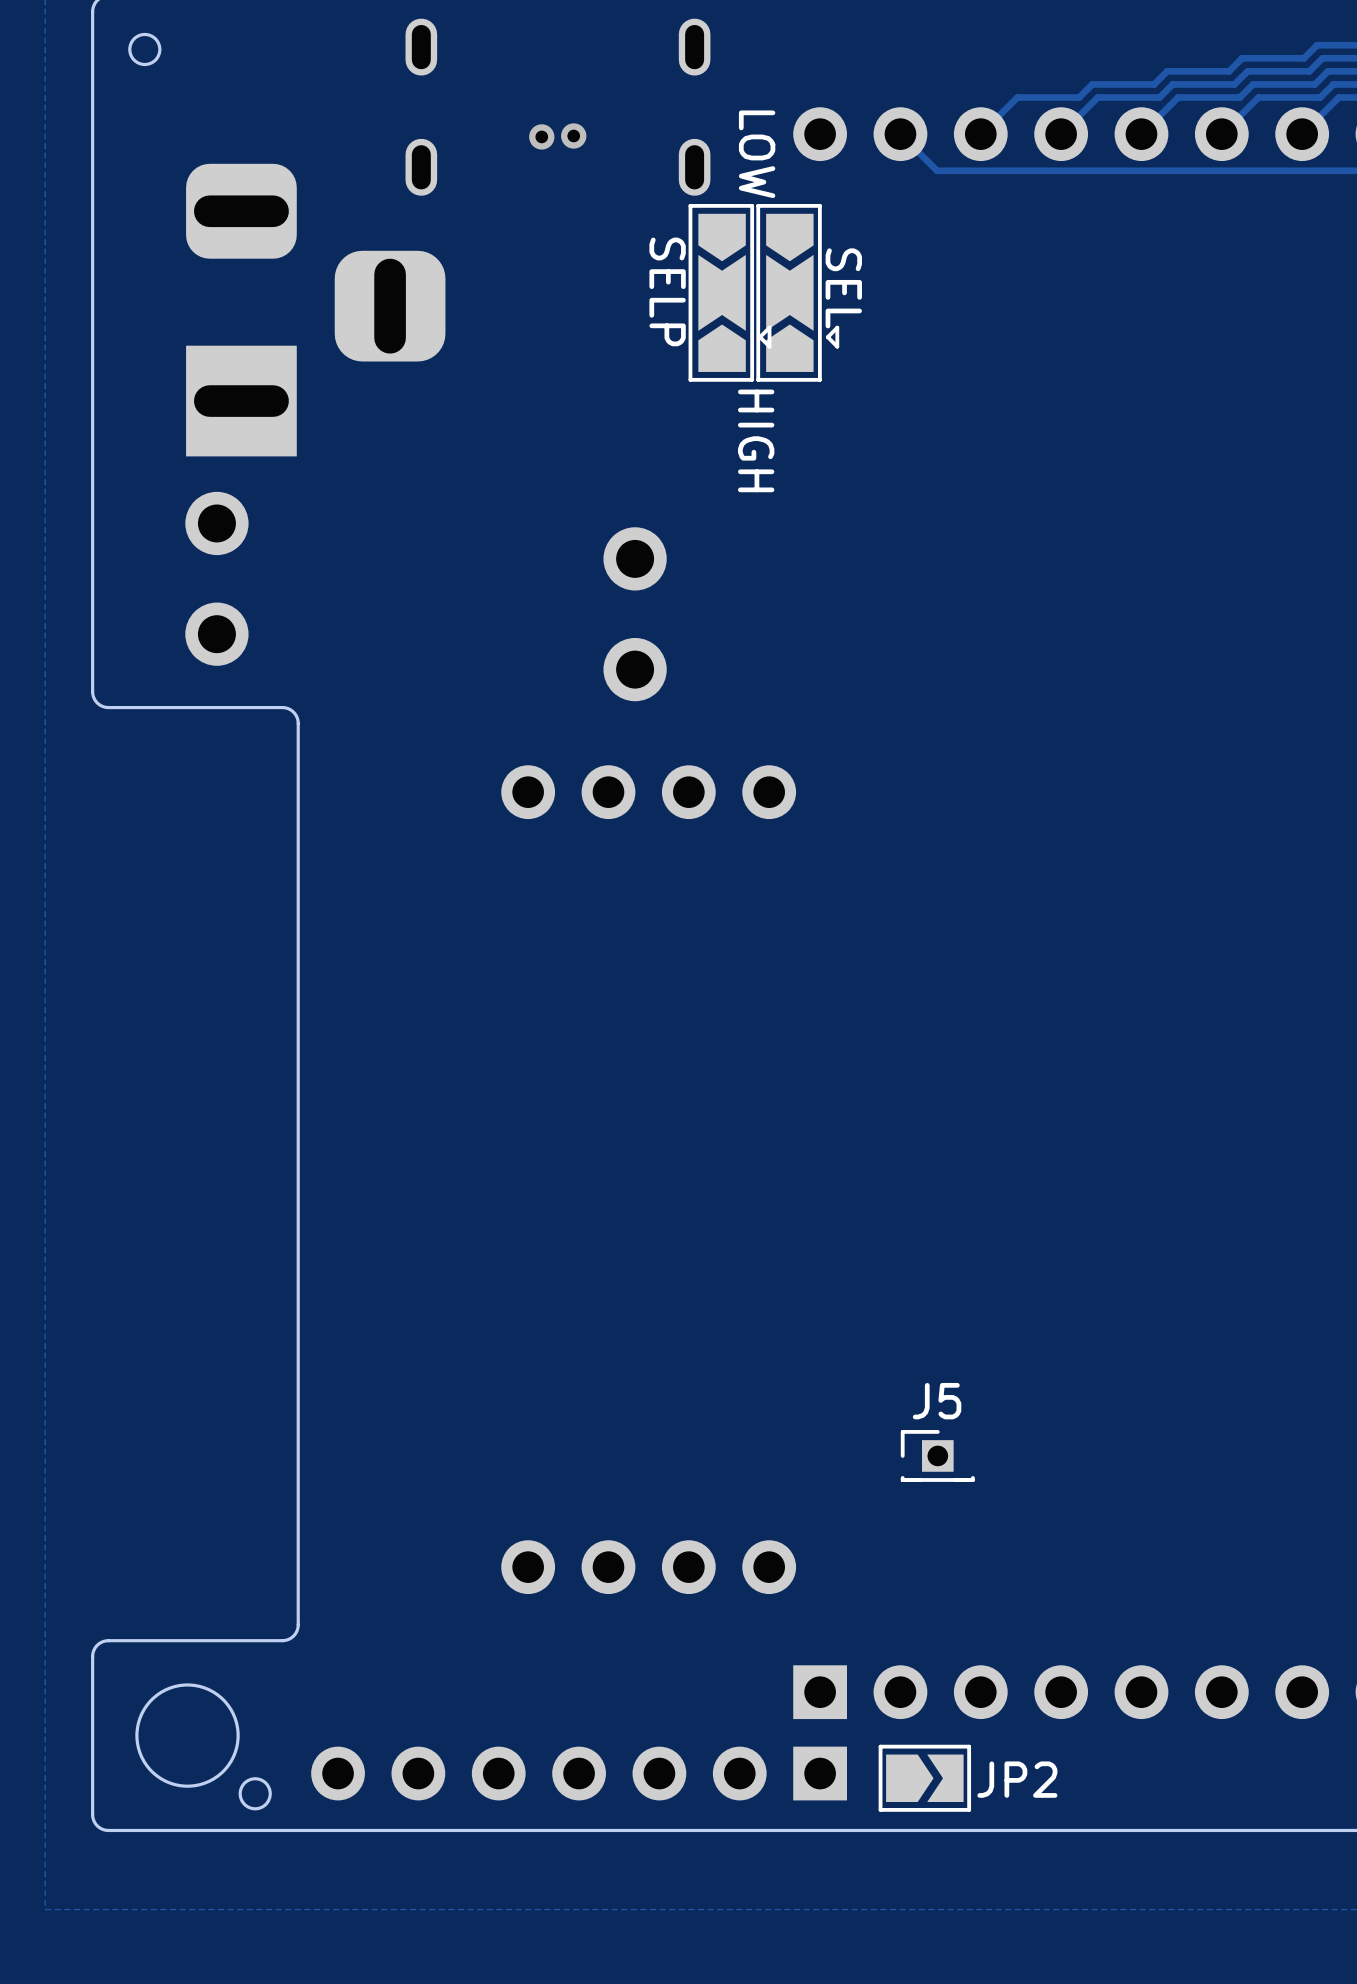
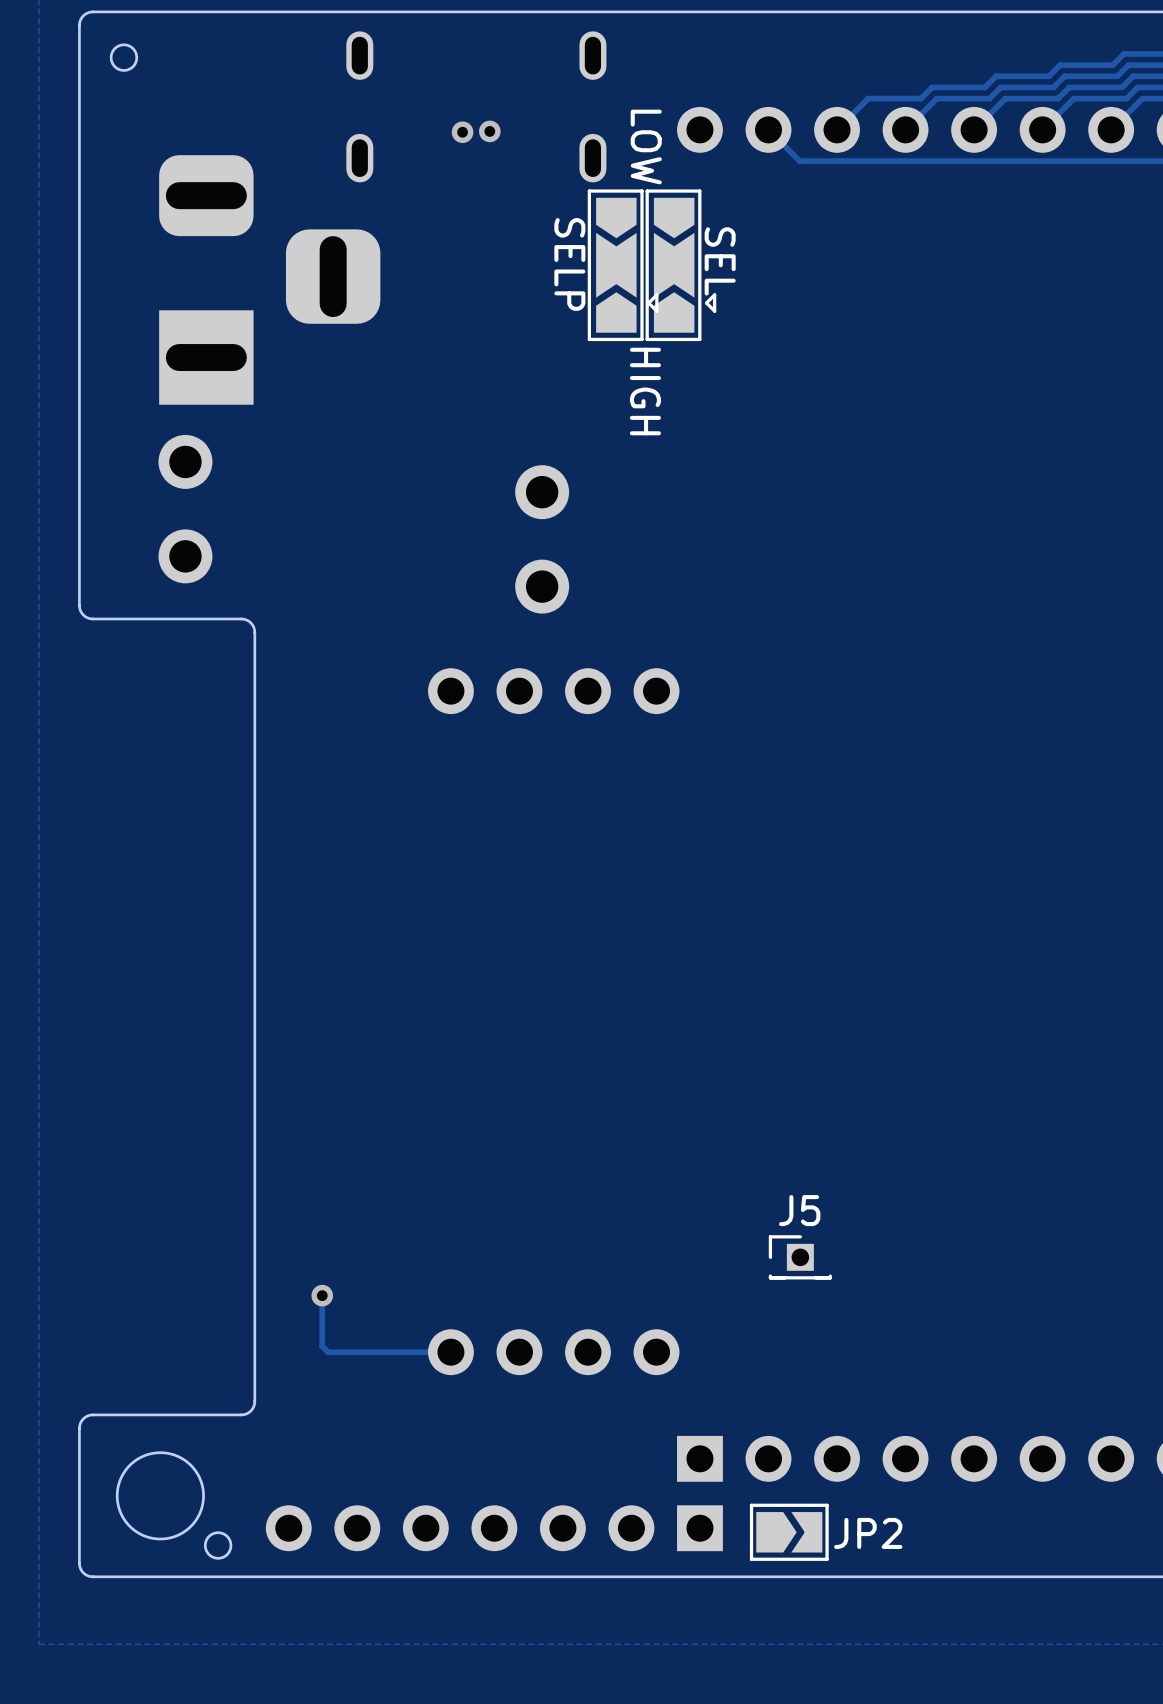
track: none -> (322, 1295) (322, 1346) (328, 1352) (450, 1352)
via: none -> (322, 1295)

